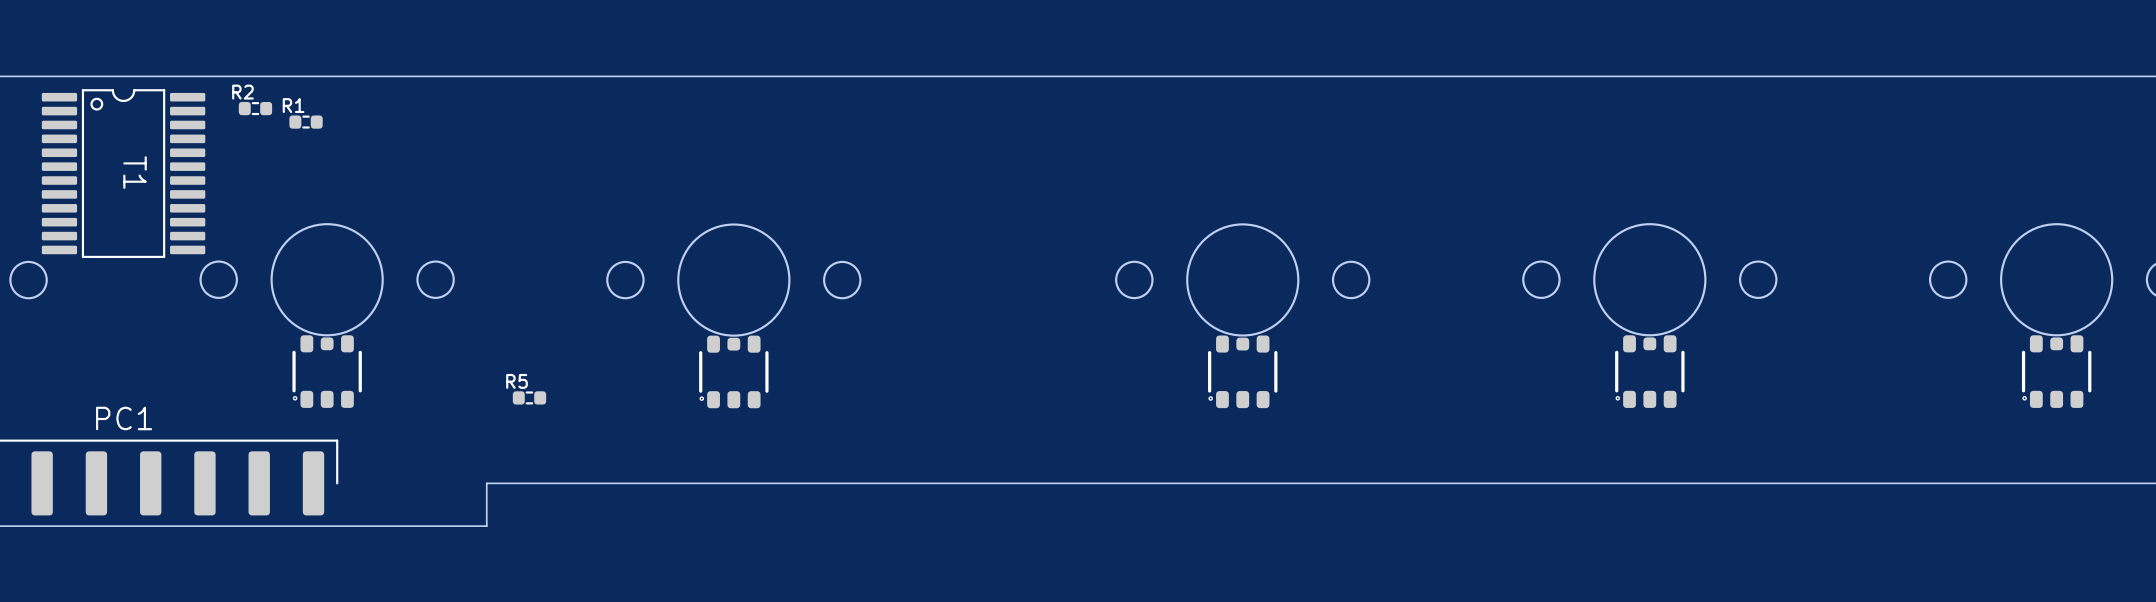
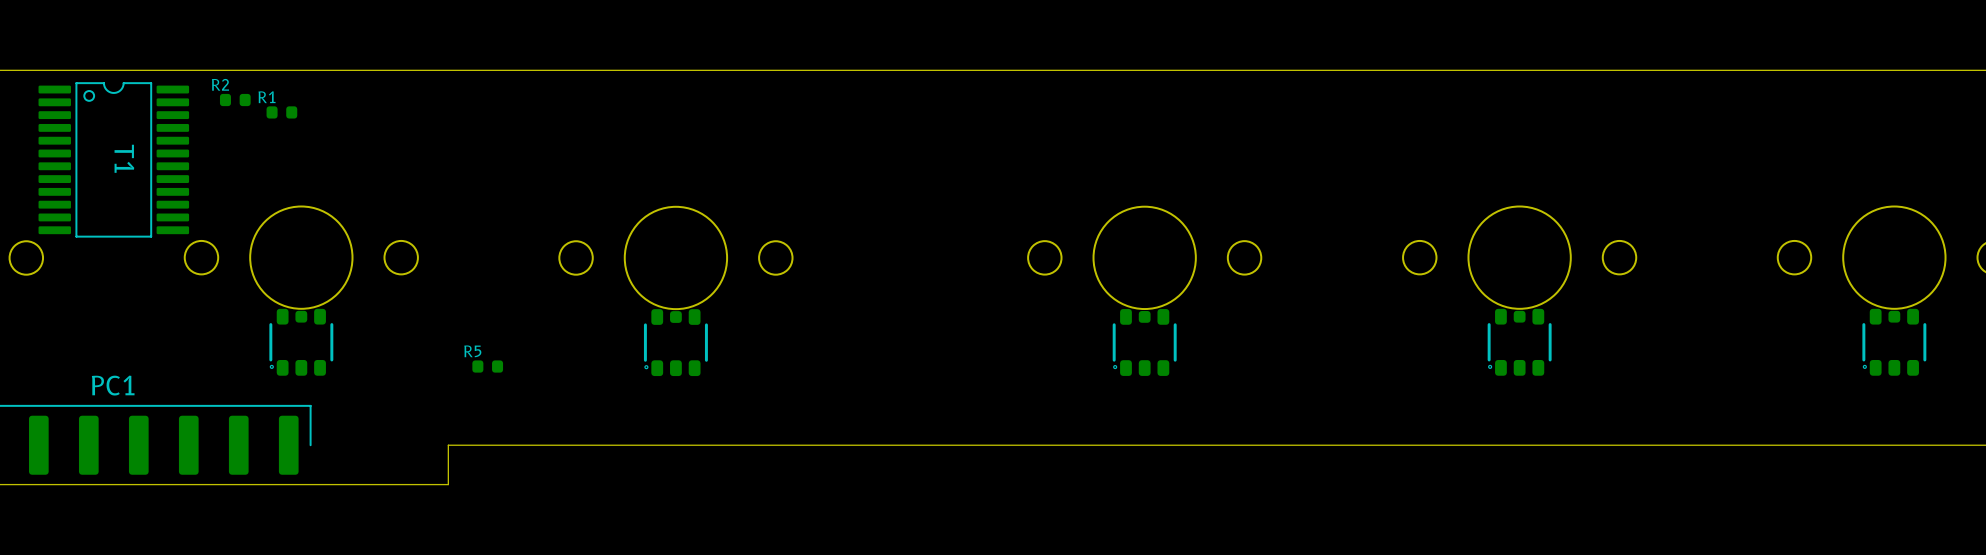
R2 footprint: [238, 101, 273, 116] -> [219, 93, 251, 107]
R1 footprint: [289, 115, 323, 129] -> [266, 106, 298, 119]
R5 footprint: [512, 391, 547, 405] -> [472, 360, 504, 373]

